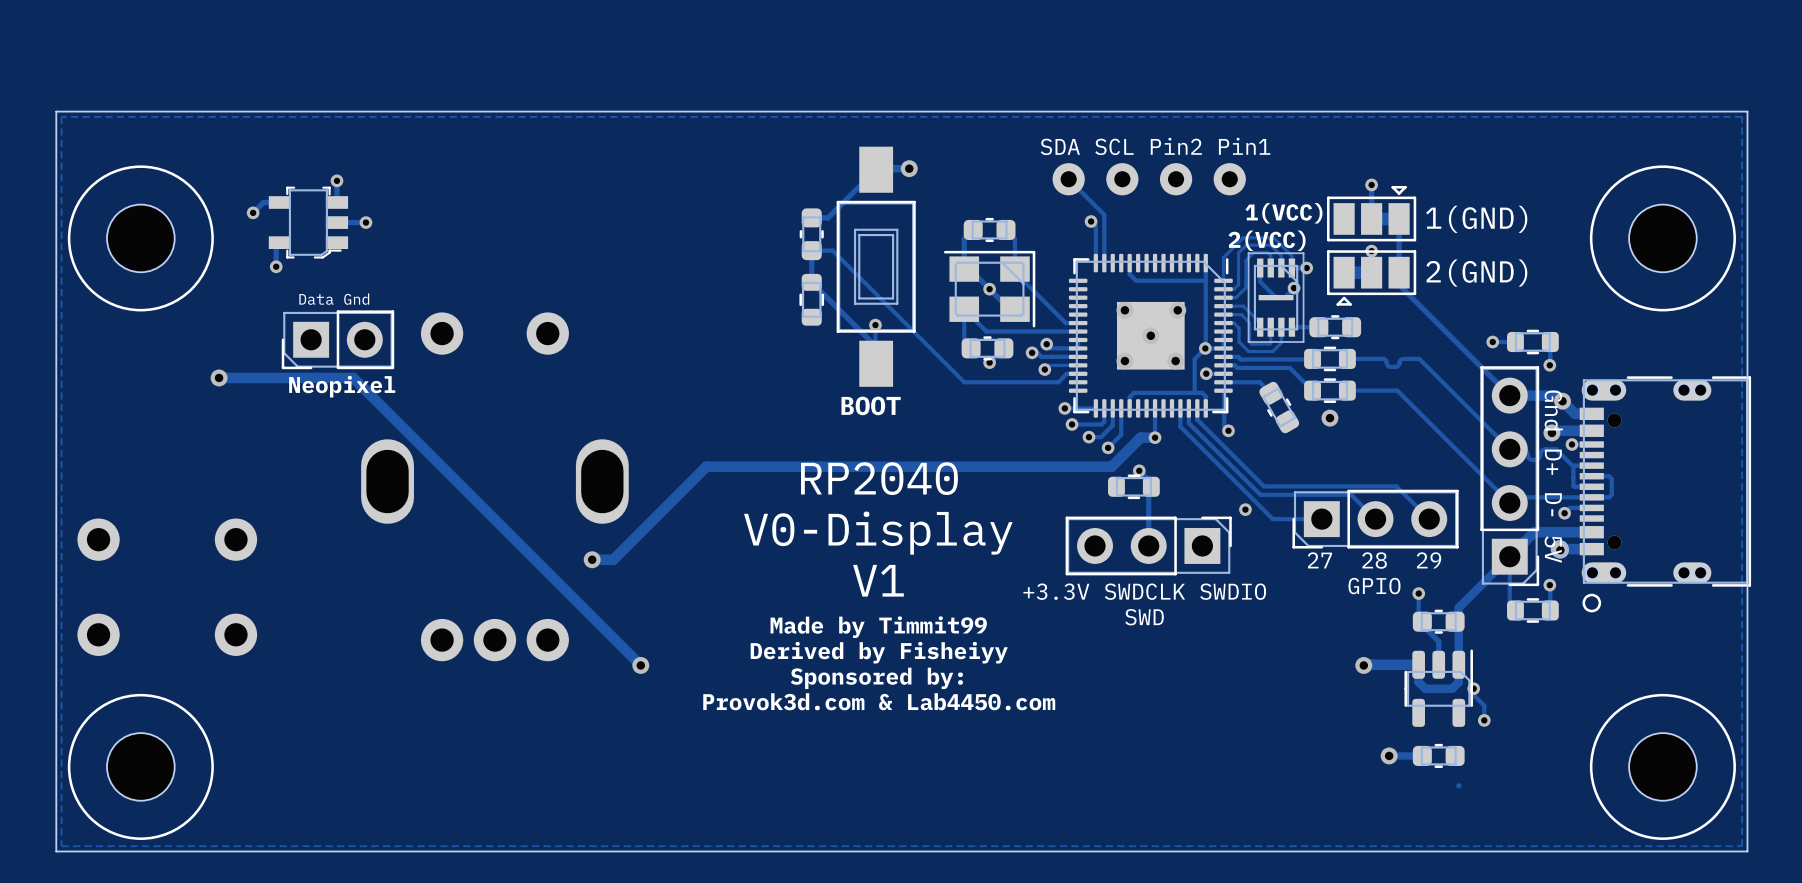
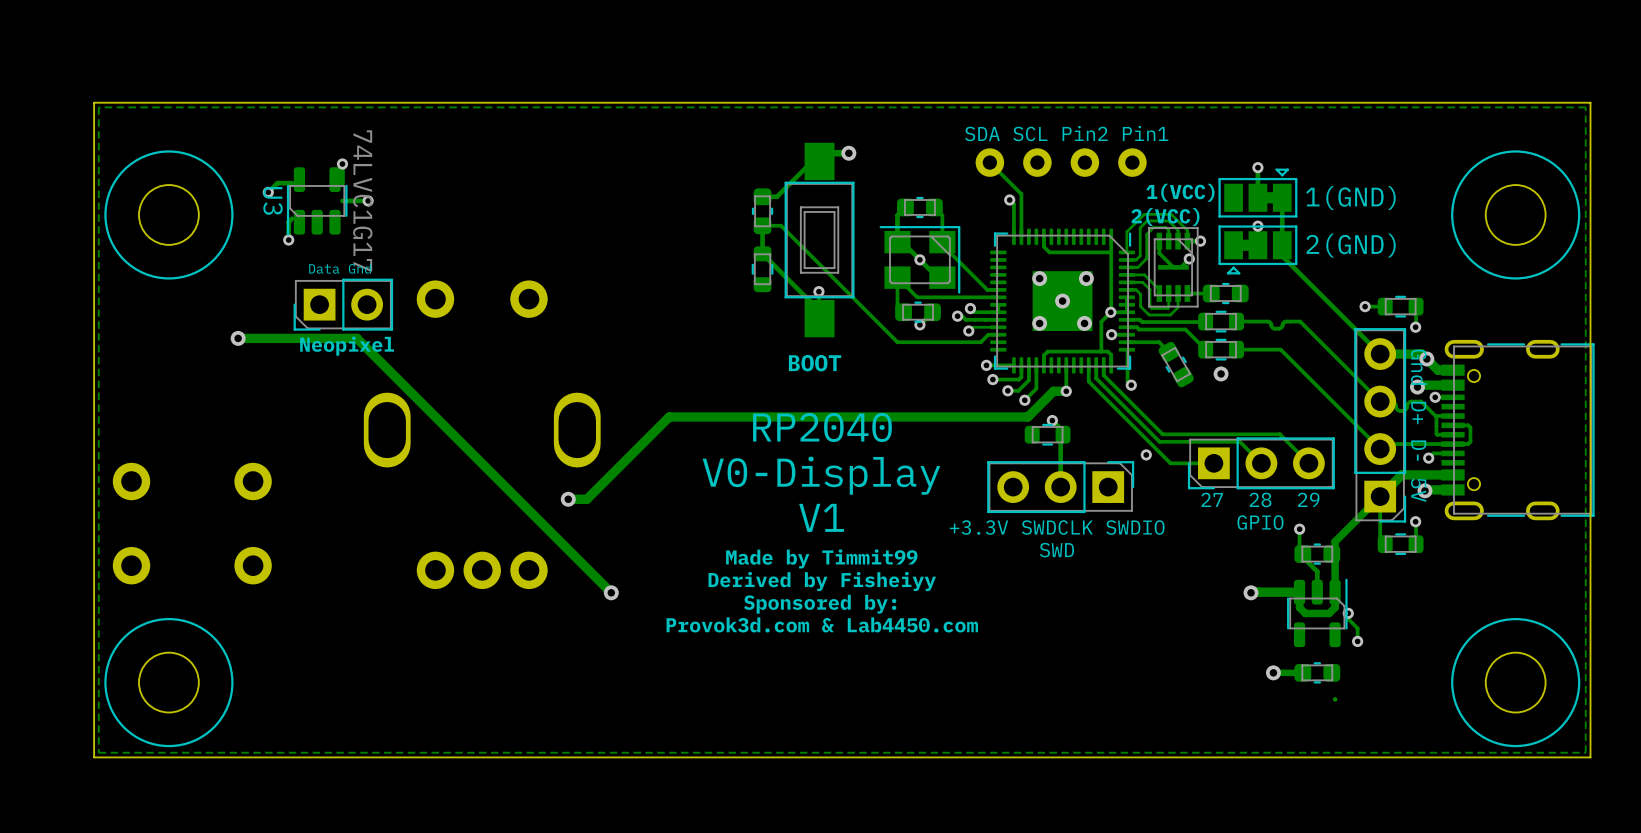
part footprint: [836, 146, 916, 387] -> [784, 142, 855, 338]
part: (308, 222) -> none
U3: none -> 74LVC1G17 (317, 201)
part footprint: [1550, 376, 1752, 613] -> [1441, 339, 1595, 521]

